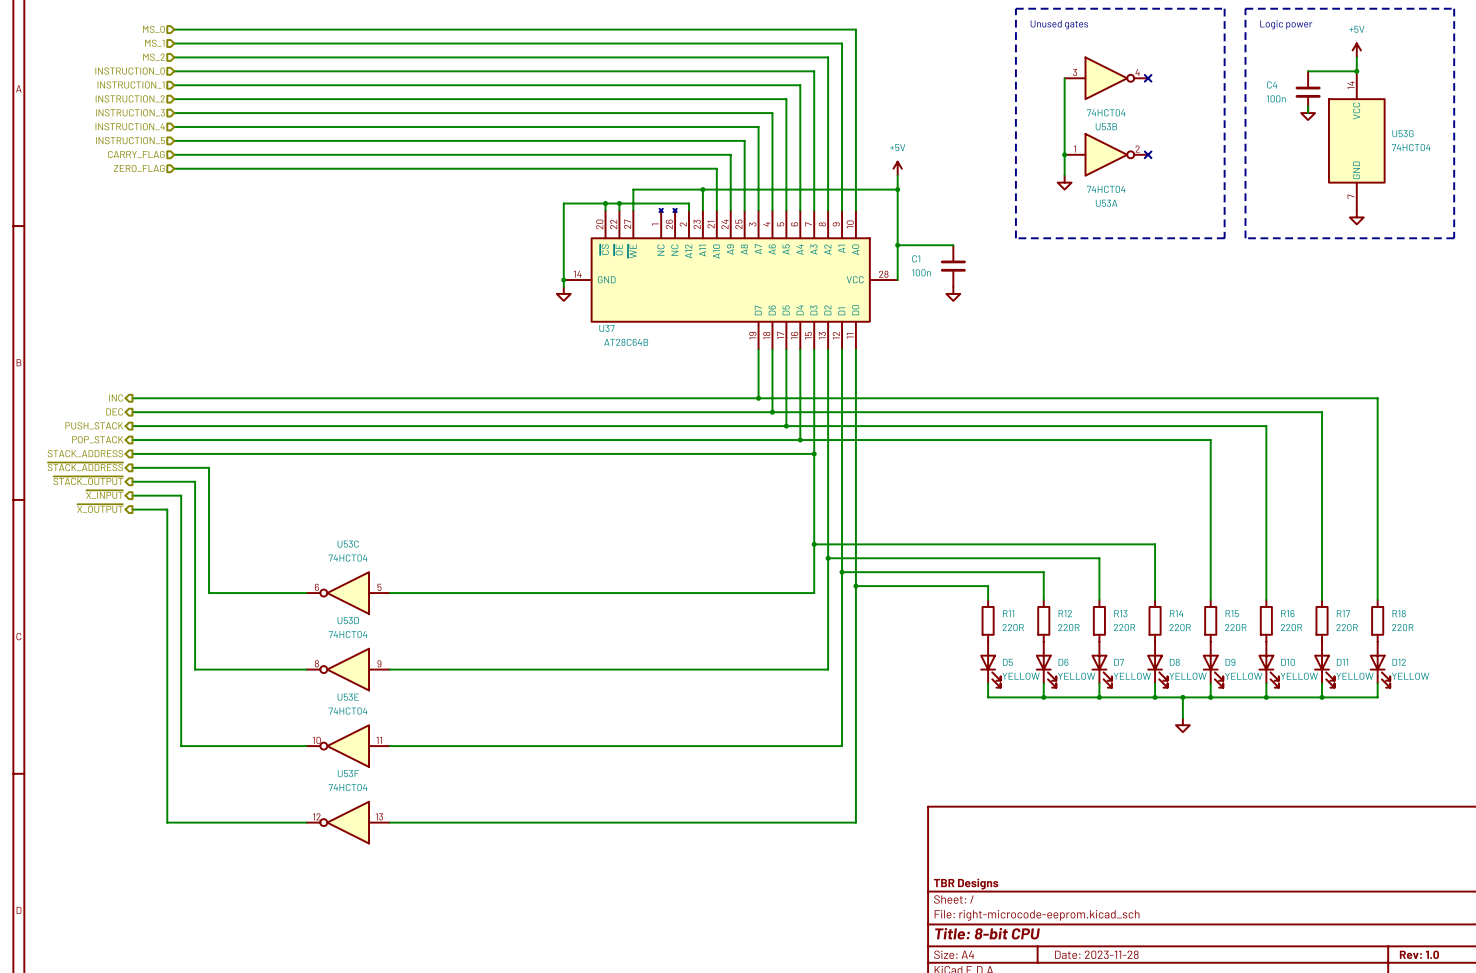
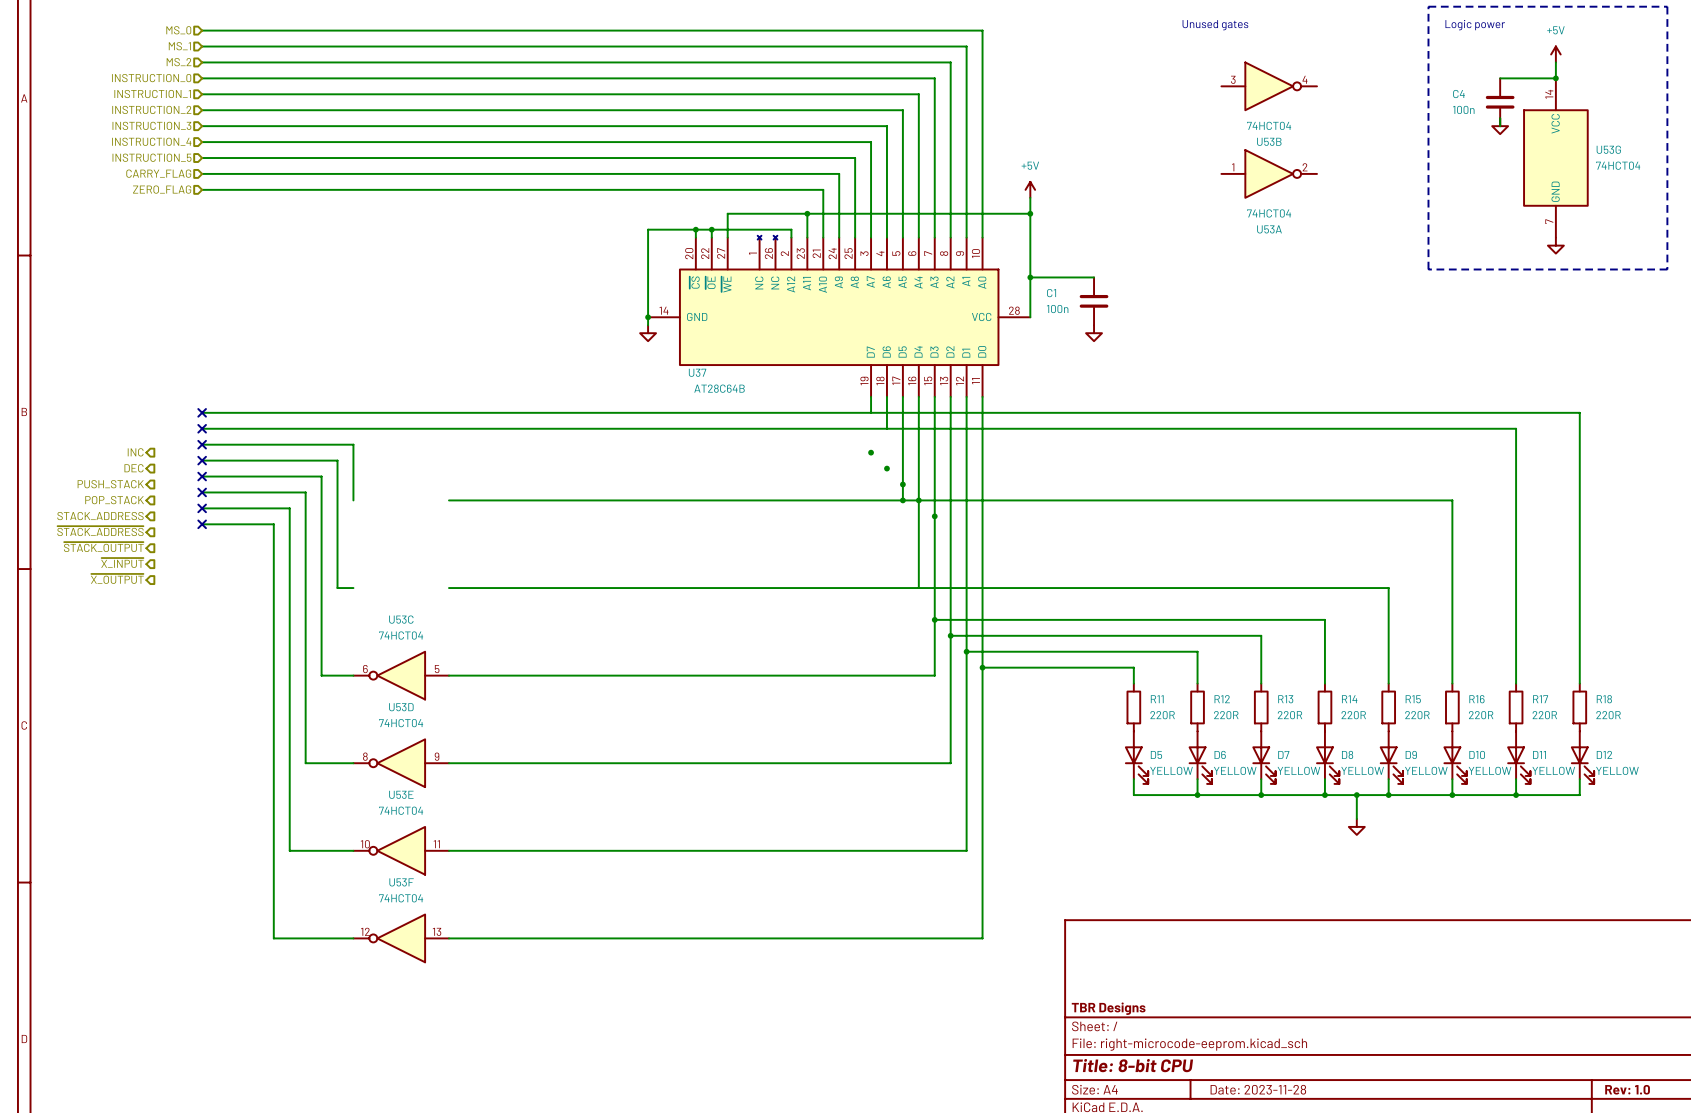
line: (1015, 8) (1224, 8) (1224, 238) (1015, 238) (1015, 8) -> none
wire: (1064, 78) (1064, 175) -> none
no-connect mark: (1148, 78) -> none
junction: (1064, 154) -> none
no-connect mark: (1148, 154) -> none
power symbol: (1064, 182) -> none
no-connect mark: none -> (202, 412)
wire: (758, 363) (758, 398) -> none
no-connect mark: none -> (202, 428)
wire: (772, 377) (772, 412) -> none
wire: none -> (202, 444) (353, 444) (353, 500)
no-connect mark: none -> (202, 444)
wire: (132, 398) (1377, 398) -> (202, 412) (1579, 412) (1579, 452)
wire: none -> (202, 460) (337, 460) (337, 588) (353, 588)
no-connect mark: none -> (202, 460)
wire: (132, 412) (1322, 412) -> (202, 428) (1516, 428) (1516, 468)
no-connect mark: none -> (202, 476)
wire: (132, 426) (1266, 426) (1266, 440) -> none
wire: none -> (902, 484) (902, 500)
no-connect mark: none -> (202, 492)
wire: (132, 440) (389, 440) -> none
junction: none -> (902, 500)
wire: none -> (918, 500) (918, 588)
wire: (1210, 440) (1210, 516) -> (1388, 500) (1452, 500)
no-connect mark: none -> (202, 508)
wire: (132, 453) (814, 453) -> none
no-connect mark: none -> (202, 524)
wire: (132, 467) (209, 467) (209, 593) (278, 593) -> (202, 476) (321, 476) (321, 675)
wire: (132, 481) (195, 481) (195, 669) (264, 669) -> (202, 492) (305, 492) (305, 763)
wire: (132, 495) (181, 495) (181, 746) (250, 746) -> (202, 508) (289, 508) (289, 850)
wire: (132, 509) (167, 509) (167, 822) (236, 822) -> (202, 524) (273, 524) (273, 938)
wire: none -> (449, 588) (1388, 588)

